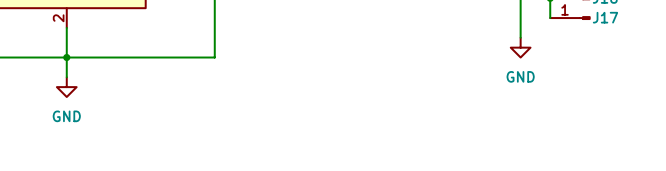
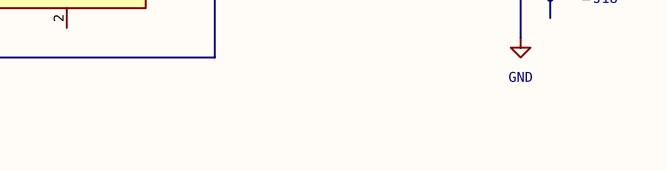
J17: (570, 18) -> none
wire: (66, 27) (66, 77) -> none
junction: (66, 57) -> none
power symbol: GND (66, 87) -> none

